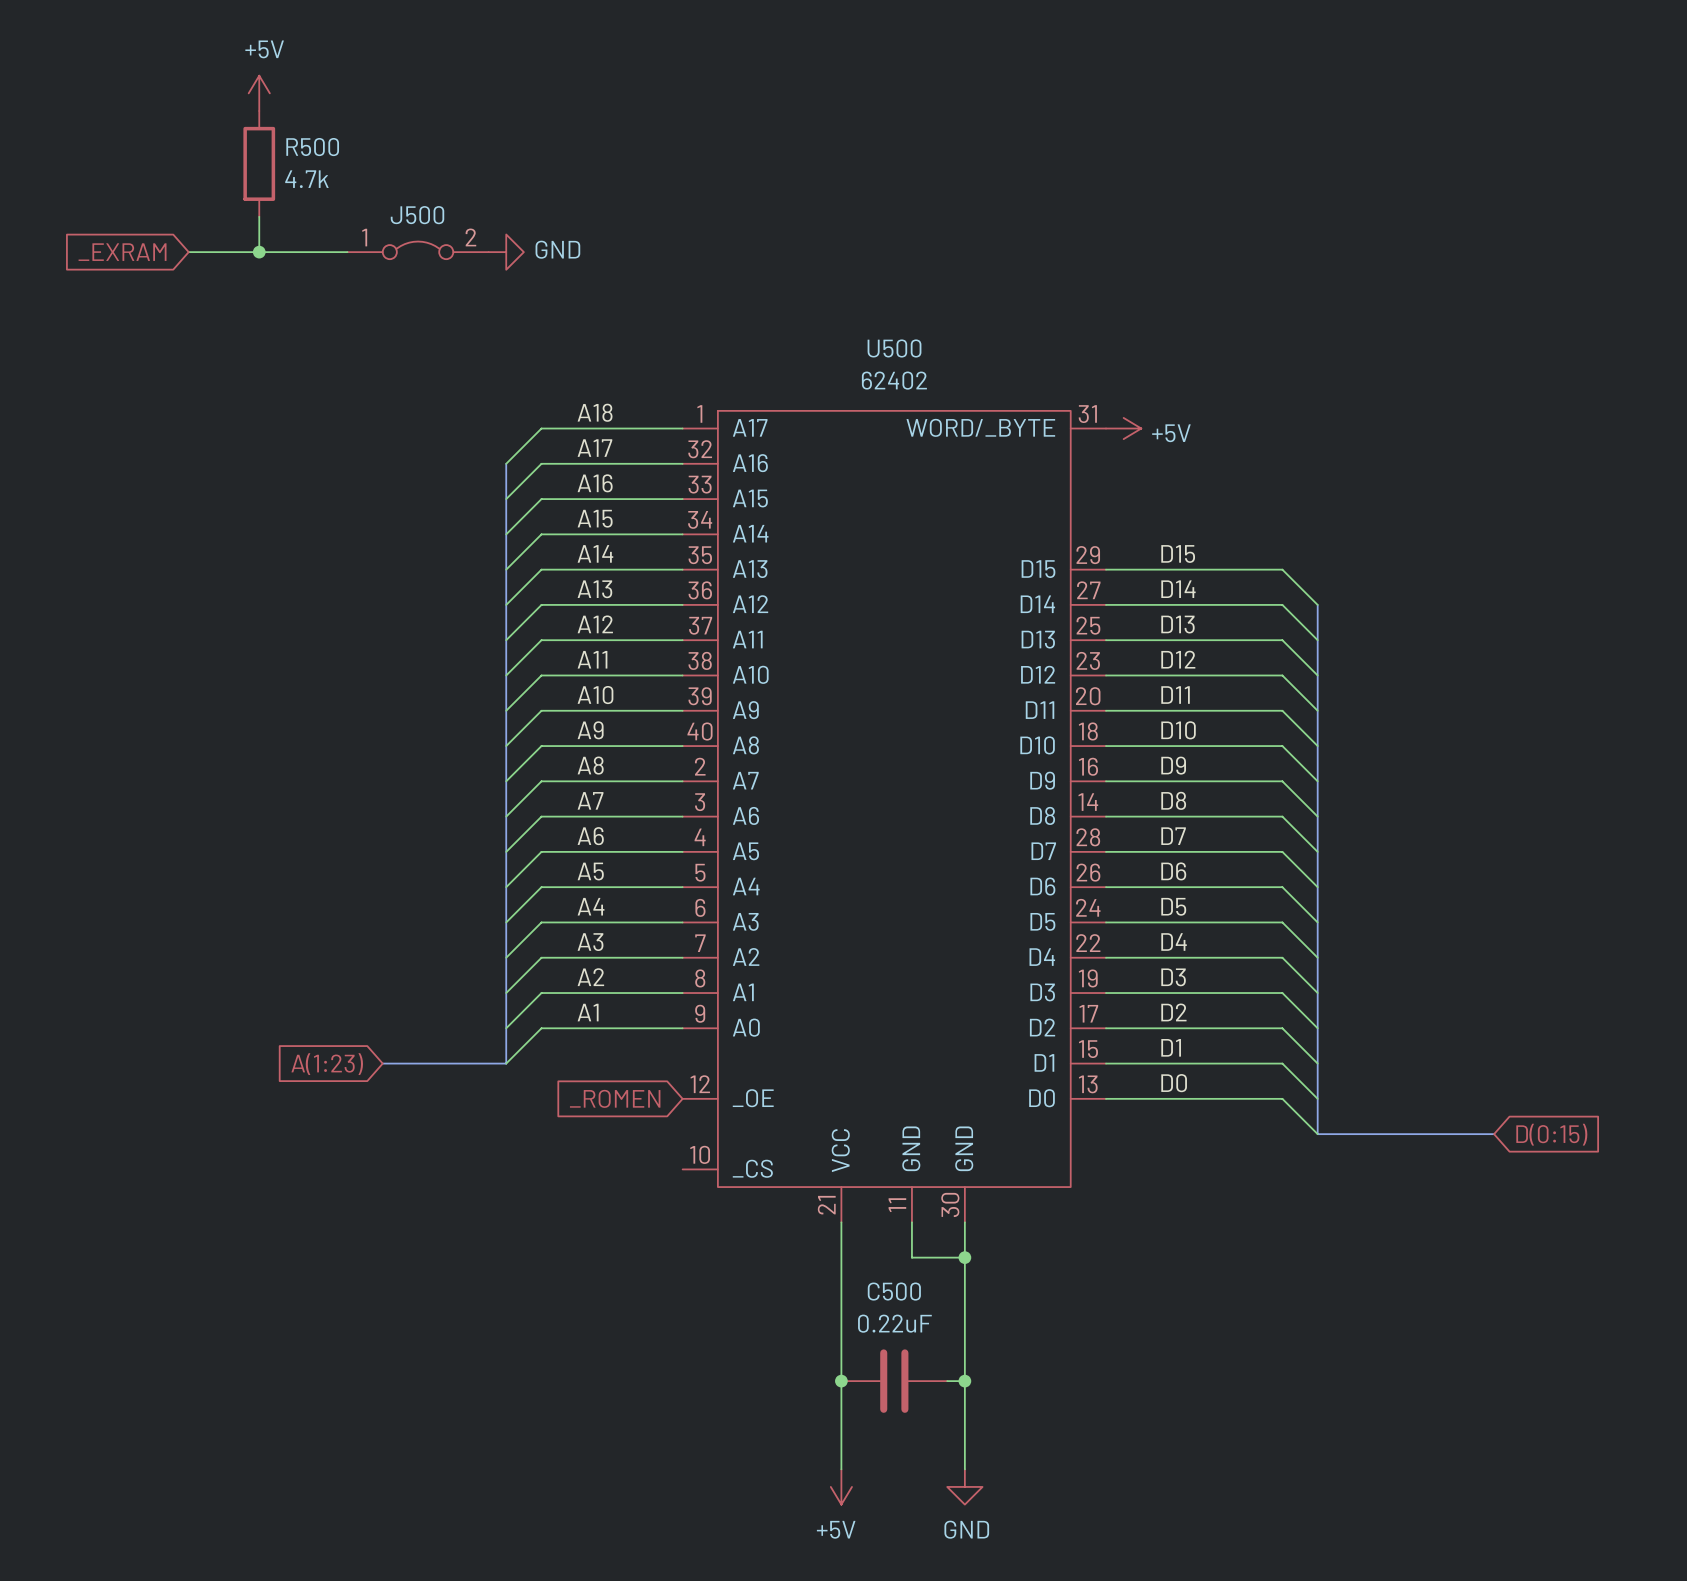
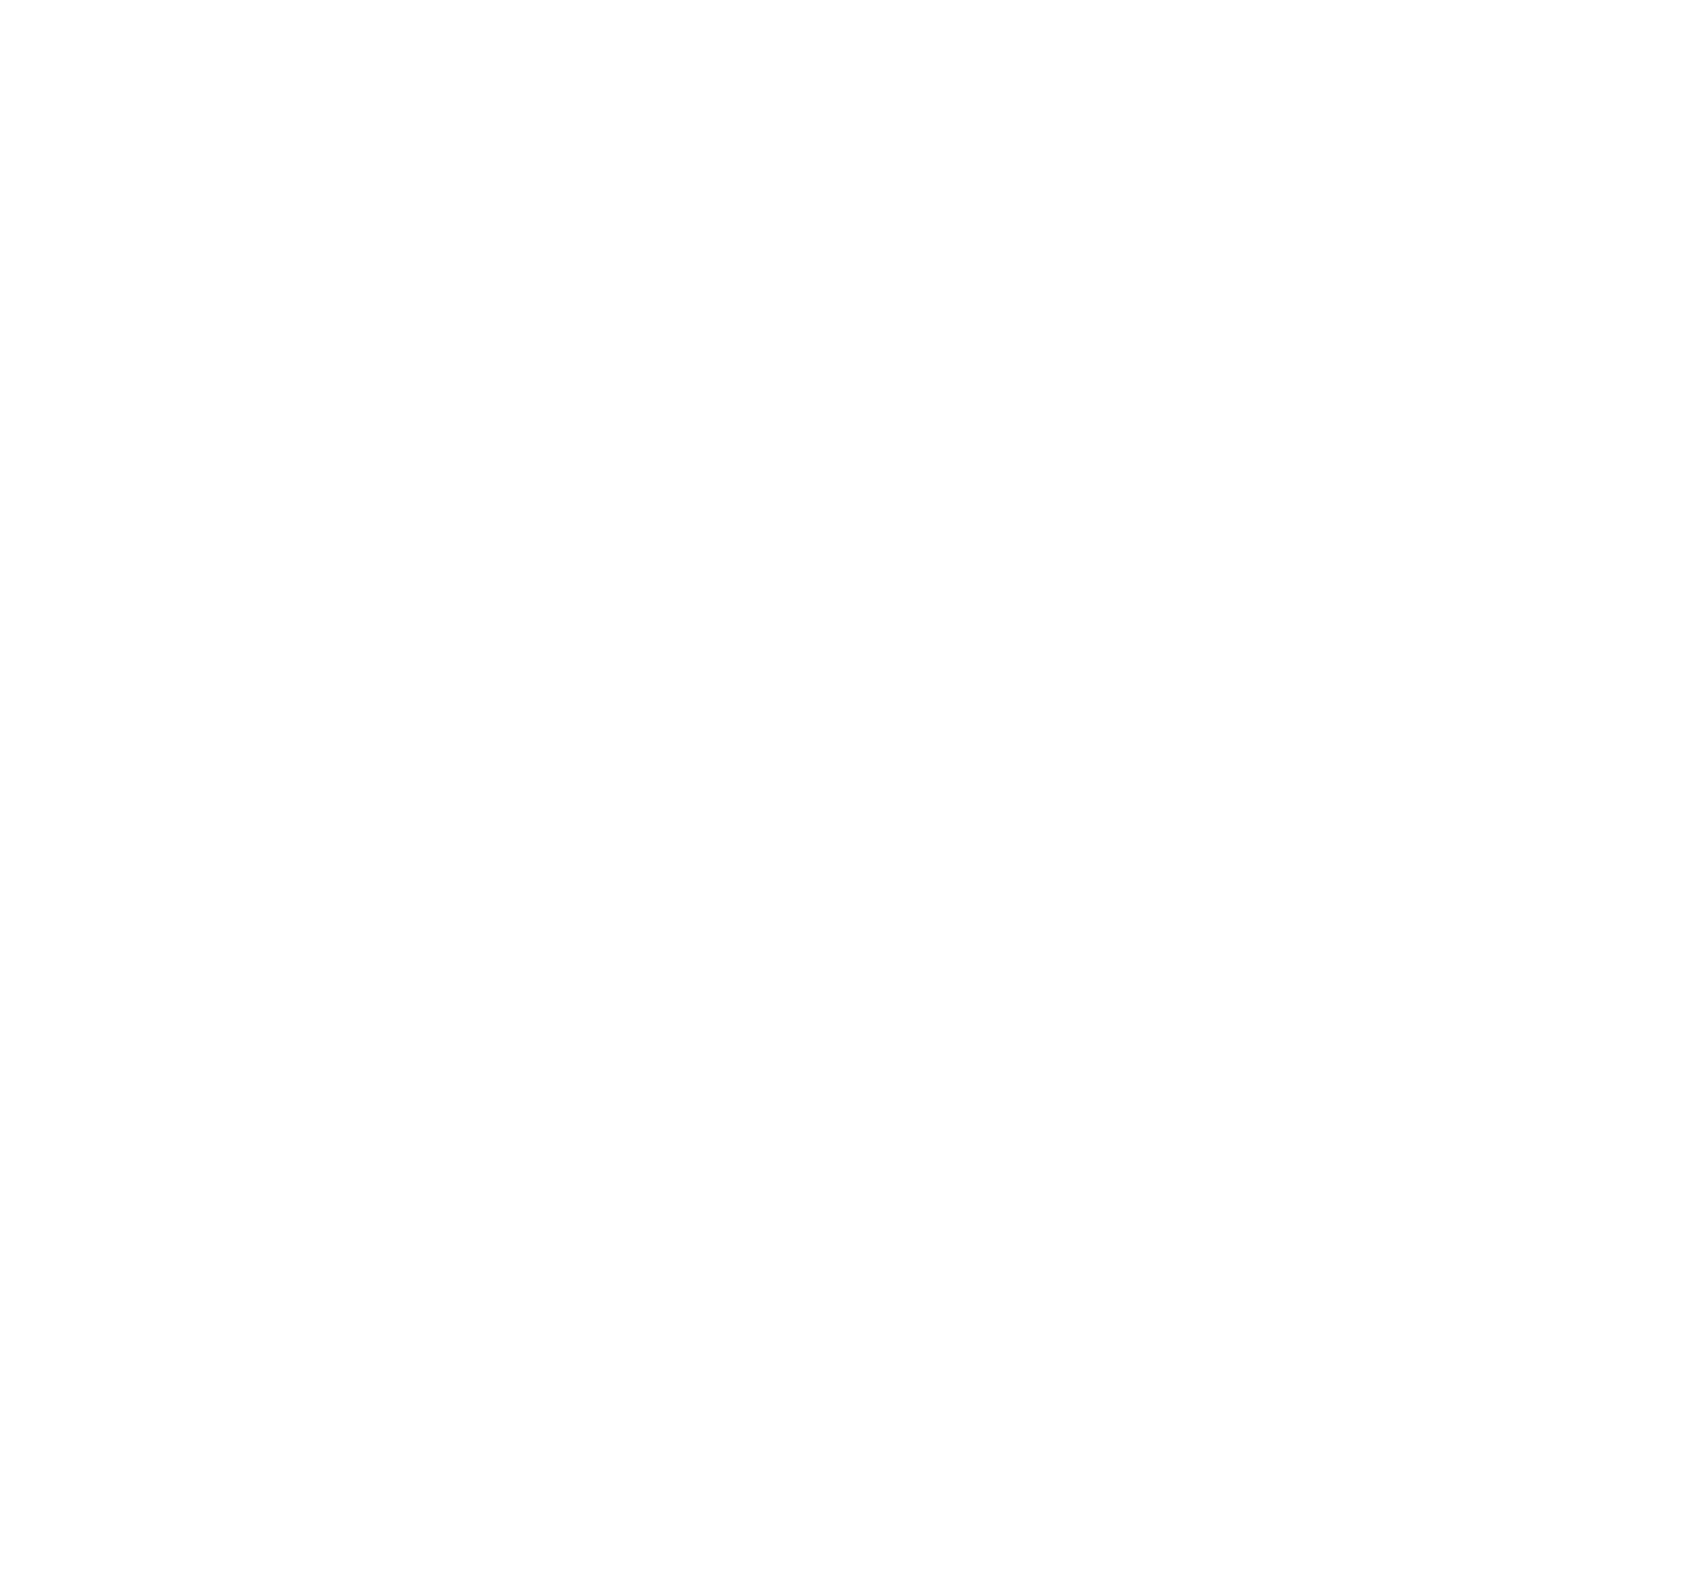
power symbol: +5V (259, 93) -> none
R500: 4.7k (259, 163) -> none
wire: (259, 216) (259, 252) -> none
J500: (418, 250) -> none
global label: _EXRAM (122, 252) -> none
wire: (188, 252) (347, 252) -> none
junction: (259, 252) -> none
power symbol: GND (506, 252) -> none
label: A18 (595, 412) -> none
wire: (682, 428) (541, 428) (506, 463) -> none
power symbol: +5V (1123, 428) -> none
label: A17 (594, 448) -> none
bus: (506, 463) (506, 1063) (382, 1063) -> none
wire: (682, 463) (541, 463) (506, 499) -> none
label: A16 (595, 483) -> none
wire: (682, 499) (541, 499) (506, 534) -> none
label: A15 (595, 518) -> none
wire: (682, 534) (541, 534) (506, 569) -> none
label: A14 (595, 553) -> none
label: D15 (1178, 553) -> none
wire: (682, 569) (541, 569) (506, 604) -> none
wire: (1106, 569) (1282, 569) (1317, 604) -> none
label: A13 (594, 589) -> none
label: D14 (1178, 589) -> none
wire: (682, 604) (541, 604) (506, 640) -> none
wire: (1106, 604) (1282, 604) (1317, 640) -> none
bus: (1317, 604) (1317, 1134) (1494, 1134) -> none
label: A12 (595, 624) -> none
label: D13 (1177, 624) -> none
wire: (682, 640) (541, 640) (506, 675) -> none
wire: (1106, 640) (1282, 640) (1317, 675) -> none
label: A11 (592, 659) -> none
label: D12 (1178, 659) -> none
wire: (682, 675) (541, 675) (506, 710) -> none
wire: (1106, 675) (1282, 675) (1317, 710) -> none
label: A10 (595, 695) -> none
label: D11 (1175, 695) -> none
wire: (682, 710) (541, 710) (506, 746) -> none
wire: (1106, 710) (1282, 710) (1317, 746) -> none
label: A9 (590, 730) -> none
label: D10 (1178, 730) -> none
wire: (682, 746) (541, 746) (506, 781) -> none
wire: (1106, 746) (1282, 746) (1317, 781) -> none
label: A8 (590, 765) -> none
label: D9 (1173, 765) -> none
wire: (682, 781) (541, 781) (506, 816) -> none
wire: (1106, 781) (1282, 781) (1317, 816) -> none
label: A7 (590, 800) -> none
label: D8 (1173, 800) -> none
wire: (682, 816) (541, 816) (506, 851) -> none
U500: 62402 (894, 816) -> none
wire: (1106, 816) (1282, 816) (1317, 851) -> none
label: A6 (590, 836) -> none
label: D7 (1173, 836) -> none
wire: (682, 851) (541, 851) (506, 887) -> none
wire: (1106, 851) (1282, 851) (1317, 887) -> none
label: A5 (590, 871) -> none
label: D6 (1173, 871) -> none
wire: (682, 887) (541, 887) (506, 922) -> none
wire: (1106, 887) (1282, 887) (1317, 922) -> none
label: A4 (591, 906) -> none
label: D5 (1173, 906) -> none
wire: (682, 922) (541, 922) (506, 957) -> none
wire: (1106, 922) (1282, 922) (1317, 957) -> none
label: D4 (1174, 941) -> none
label: A3 (590, 942) -> none
wire: (682, 957) (541, 957) (506, 993) -> none
wire: (1106, 957) (1282, 957) (1317, 993) -> none
label: A2 (590, 977) -> none
label: D3 (1173, 977) -> none
wire: (682, 993) (541, 993) (506, 1028) -> none
wire: (1106, 993) (1282, 993) (1317, 1028) -> none
label: A1 (588, 1012) -> none
label: D2 (1173, 1012) -> none
wire: (682, 1028) (541, 1028) (506, 1063) -> none
wire: (1106, 1028) (1282, 1028) (1317, 1063) -> none
label: D1 (1171, 1047) -> none
wire: (1106, 1063) (1282, 1063) (1317, 1098) -> none
global label: A(1:23) (327, 1064) -> none
label: D0 (1174, 1083) -> none
global label: _ROMEN (615, 1098) -> none
wire: (1106, 1098) (1282, 1098) (1317, 1134) -> none
global label: D(0:15) (1551, 1134) -> none
wire: (841, 1222) (841, 1469) -> none
wire: (911, 1222) (911, 1257) (964, 1257) -> none
wire: (964, 1222) (964, 1469) -> none
junction: (964, 1257) -> none
junction: (841, 1381) -> none
C500: 0.22uF (894, 1381) -> none
wire: (947, 1381) (964, 1381) -> none
junction: (964, 1381) -> none
power symbol: +5V (841, 1486) -> none
power symbol: GND (964, 1486) -> none

